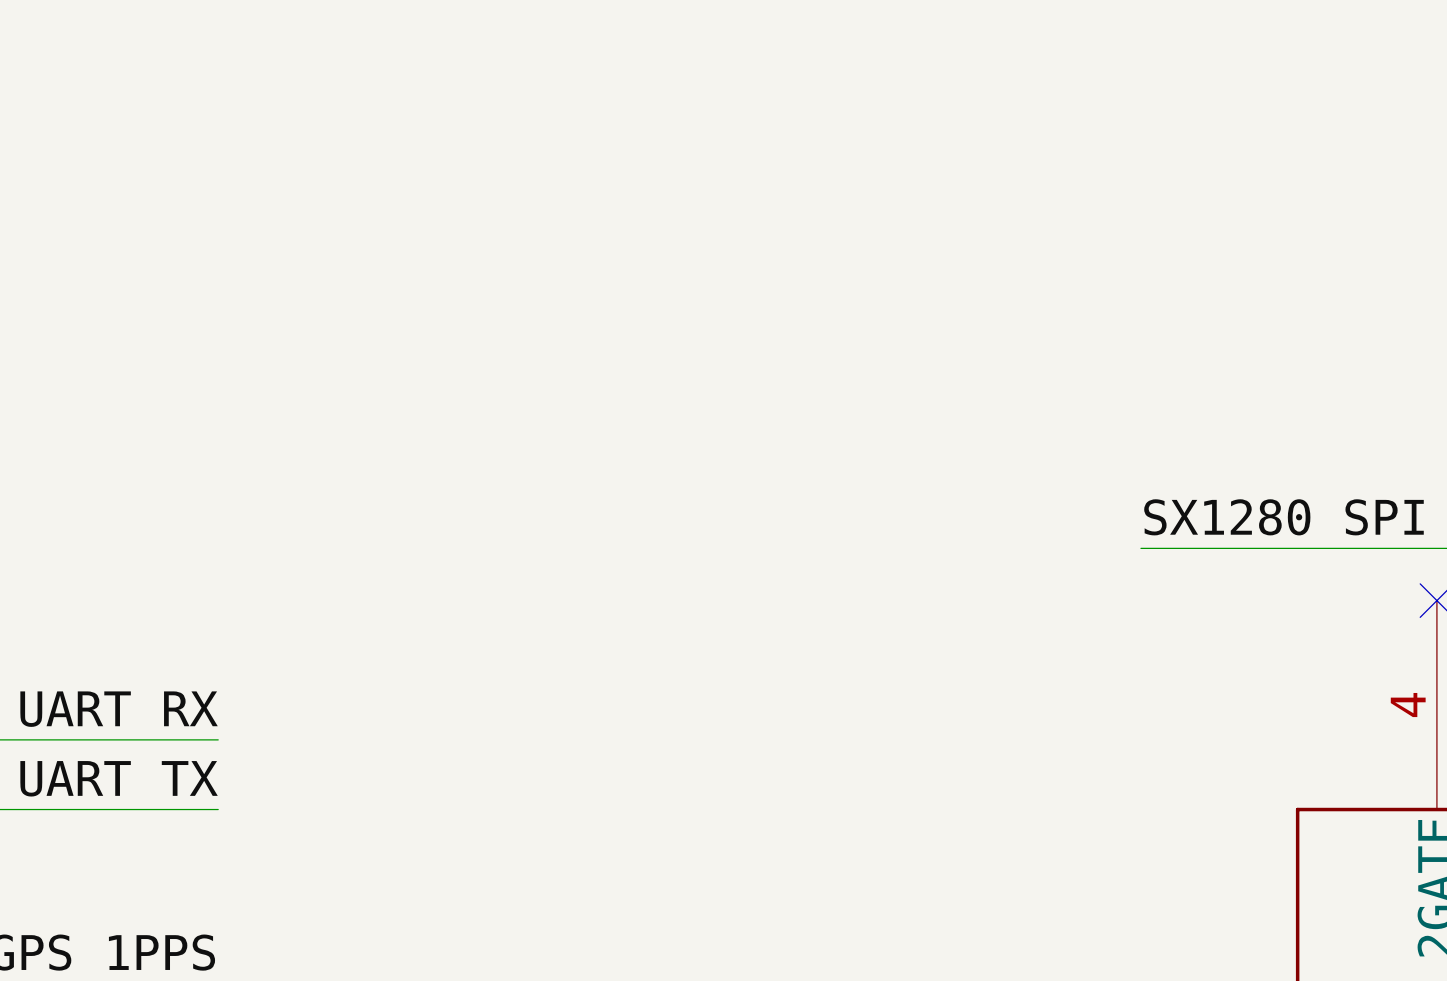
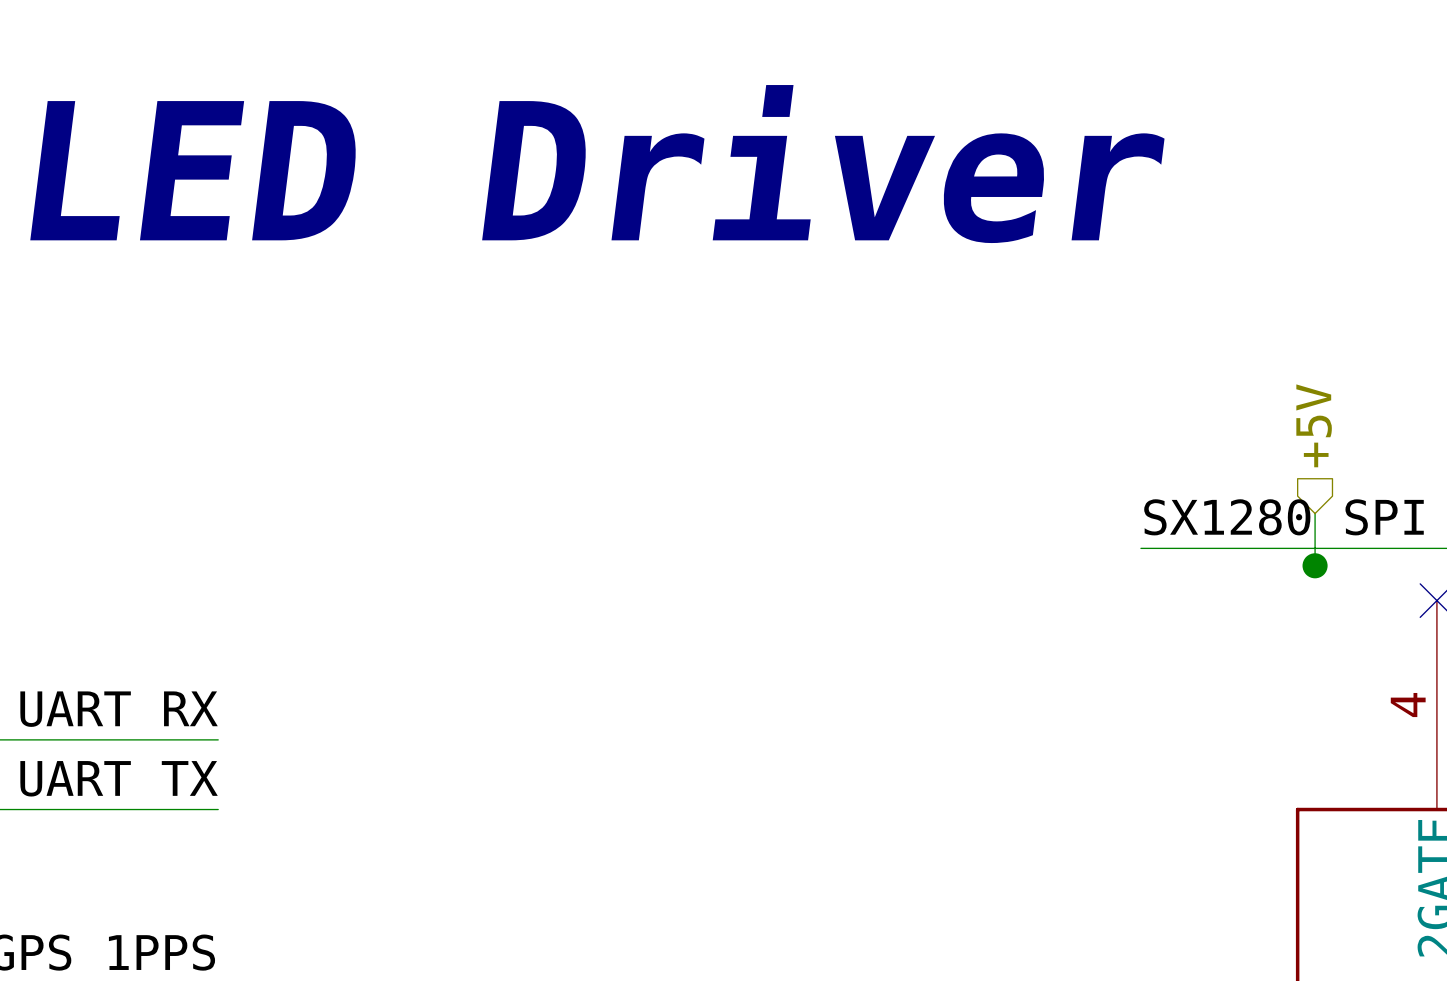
text: none -> LED Driver (597, 164)
hierarchical label: none -> +5V (1314, 425)
wire: none -> (1315, 513) (1315, 565)
junction: none -> (1315, 565)

